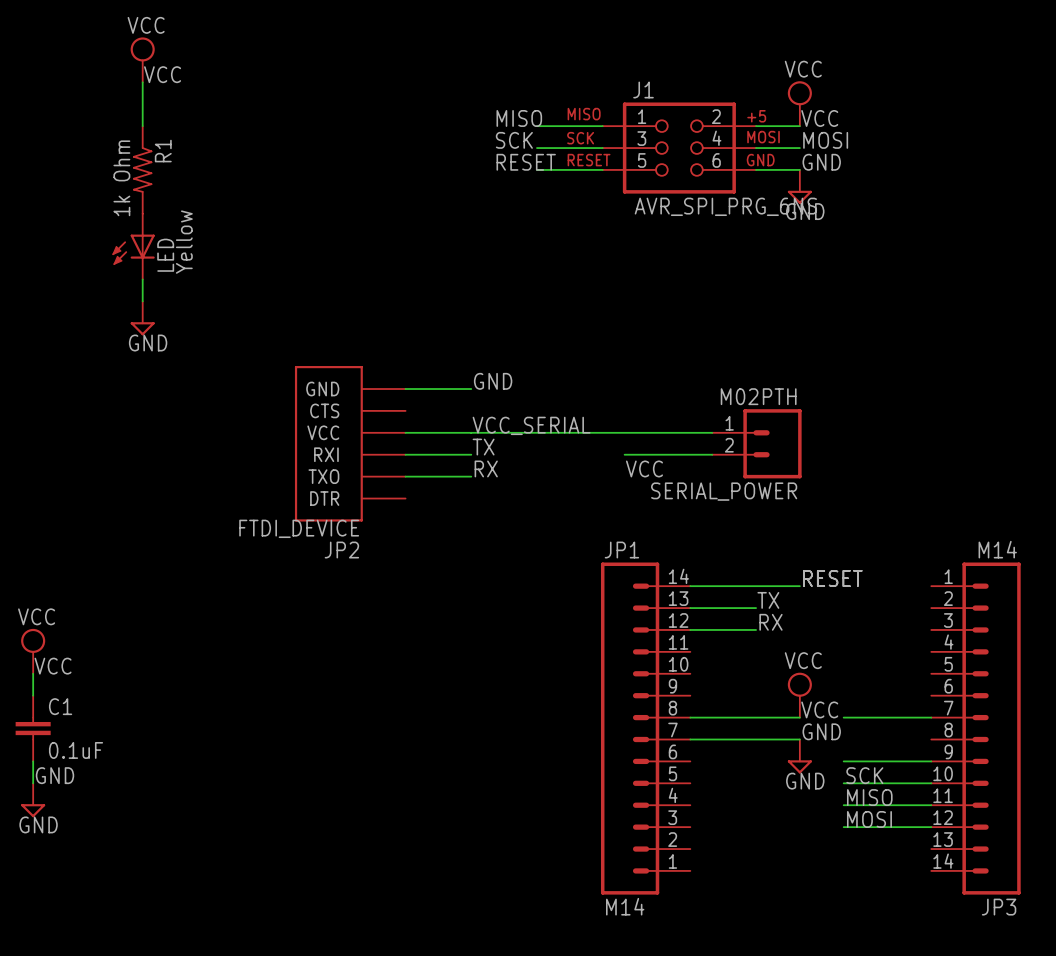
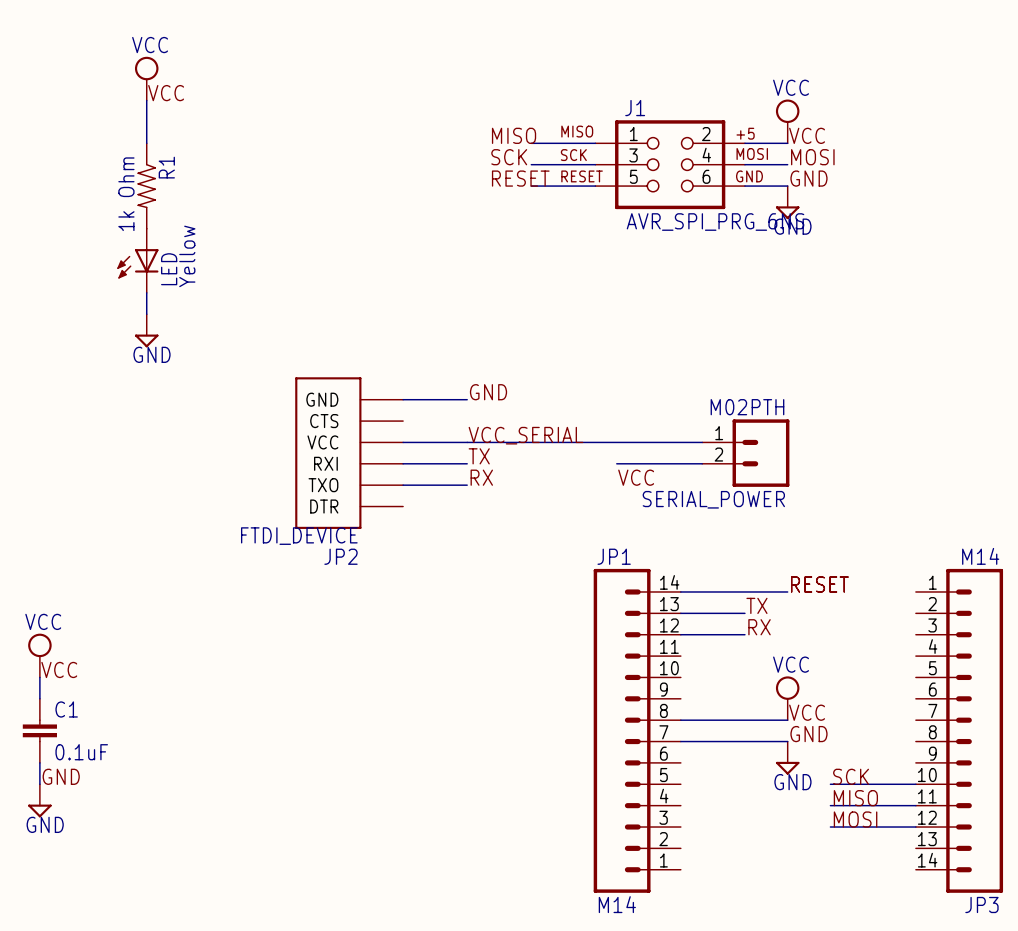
wire: (843, 717) (931, 717) -> none
wire: (843, 761) (931, 761) -> none

